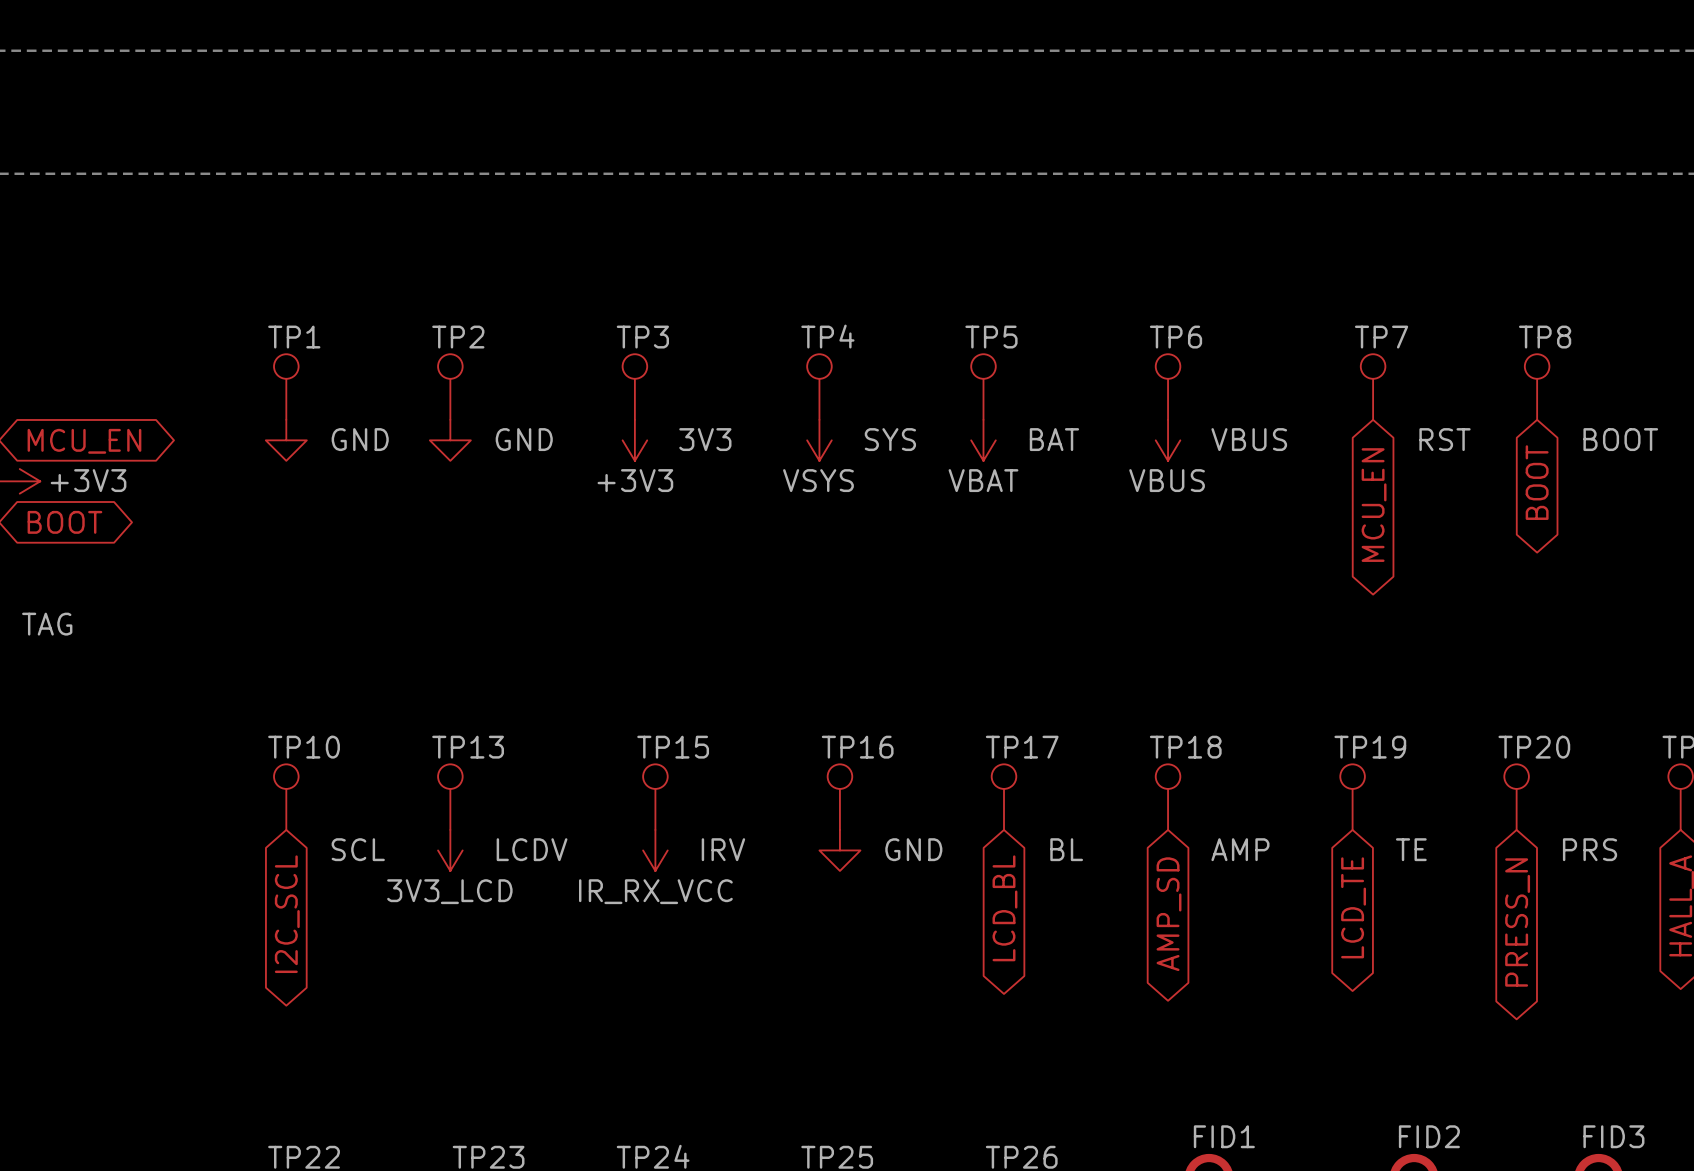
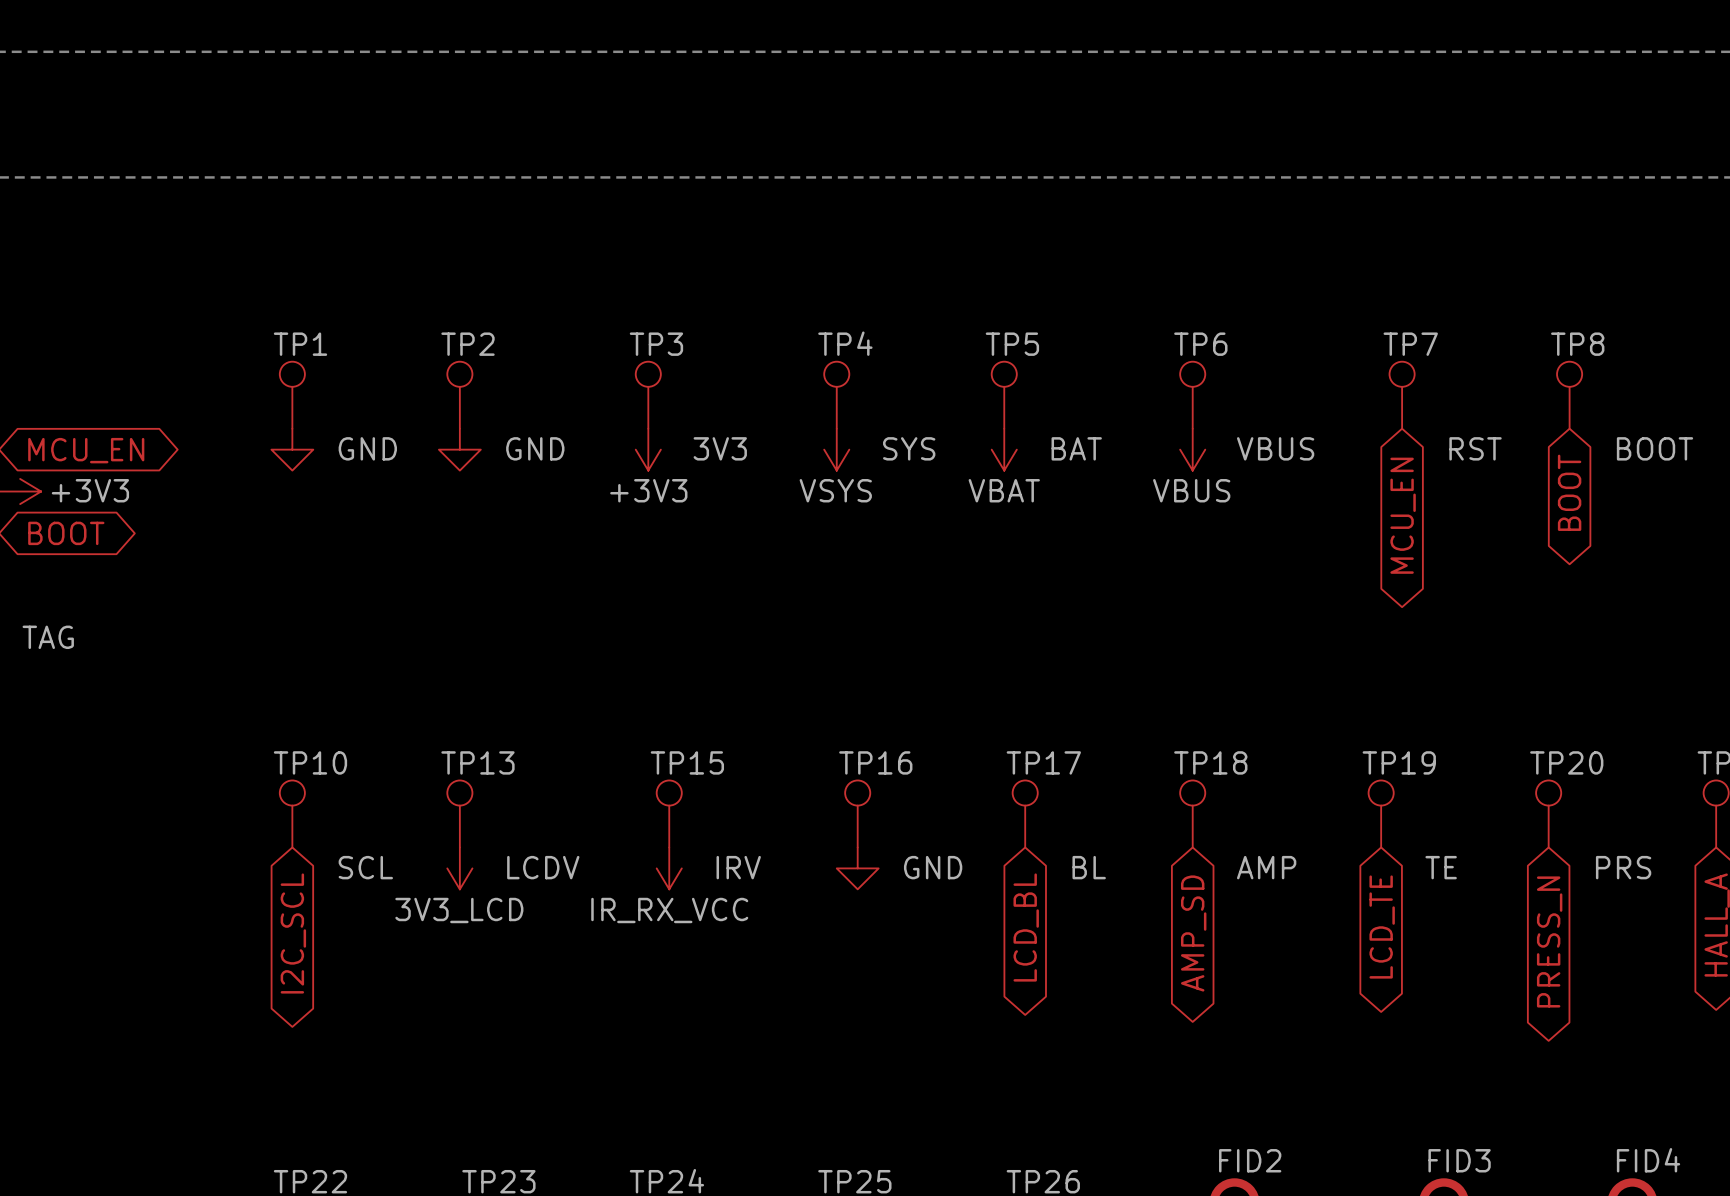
FID1 name: FID1 (1224, 1136) -> FID2 (1250, 1160)
FID2 name: FID2 (1429, 1136) -> FID3 (1459, 1160)
FID3 name: FID3 (1613, 1136) -> FID4 (1648, 1160)

